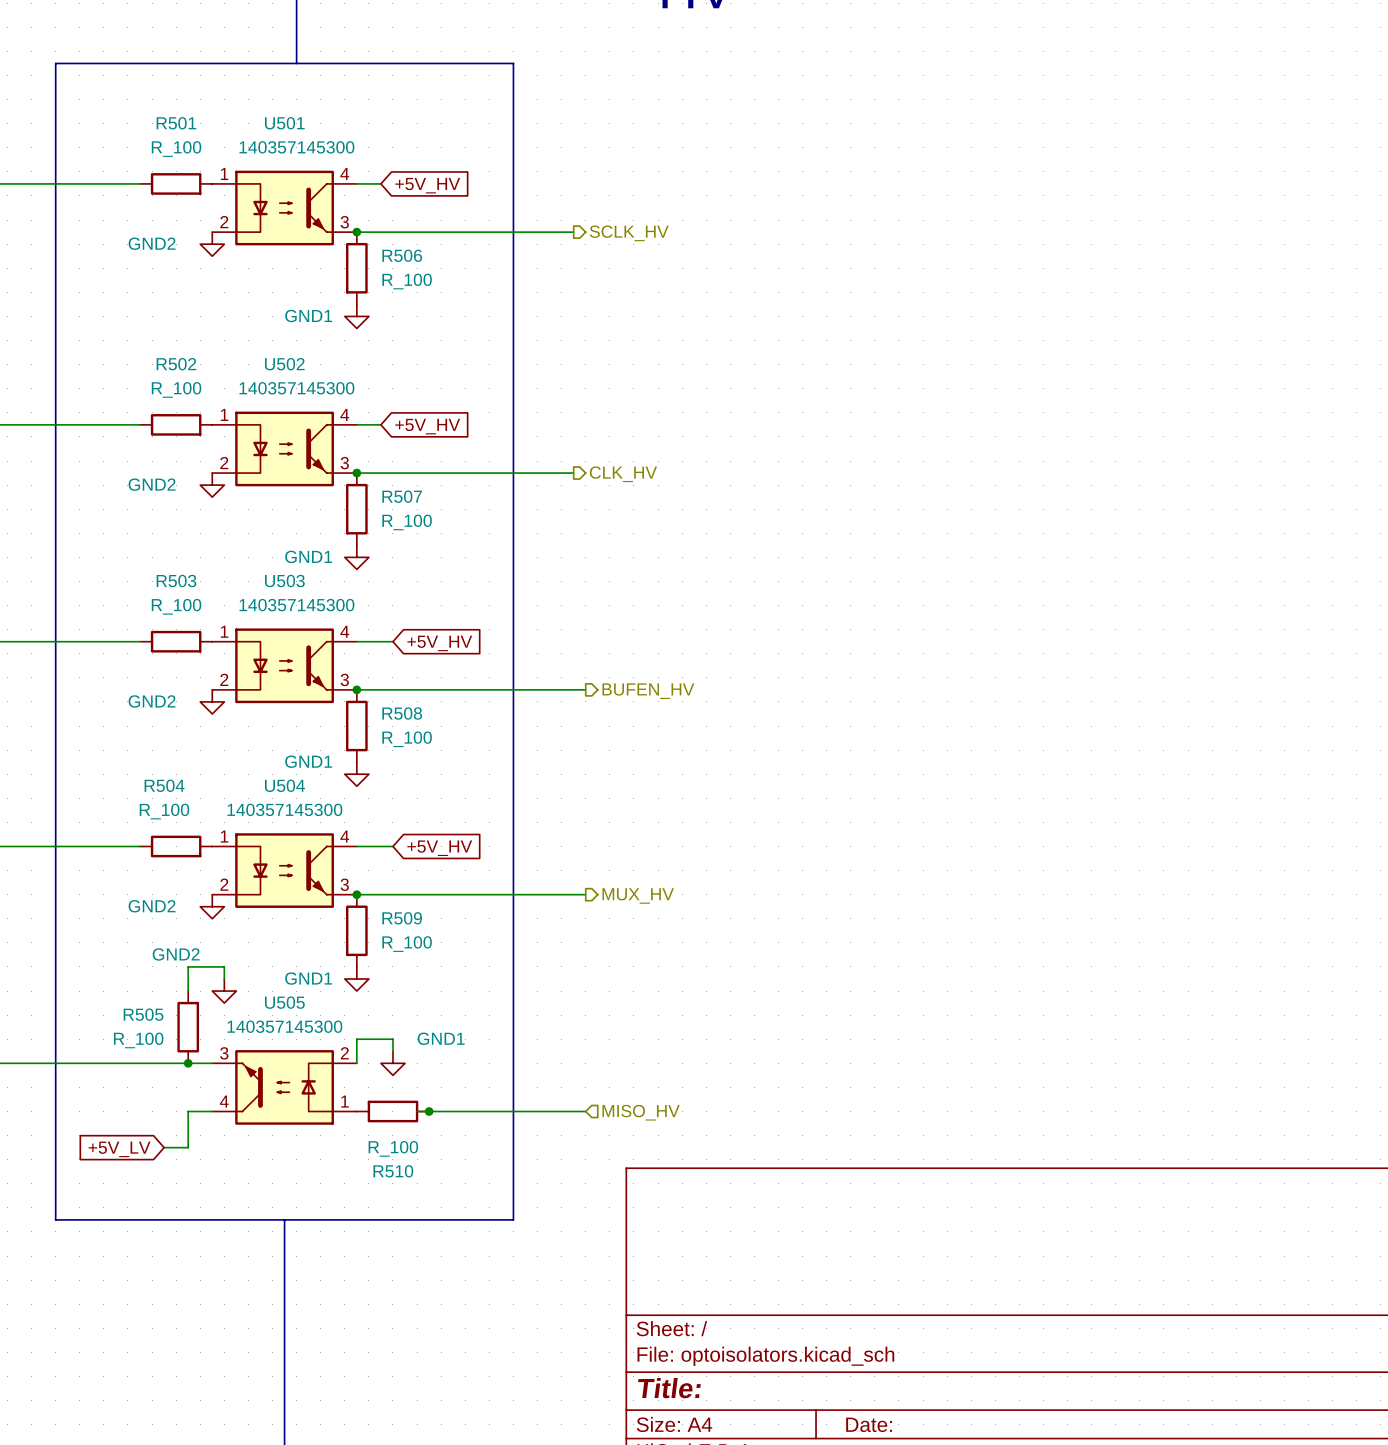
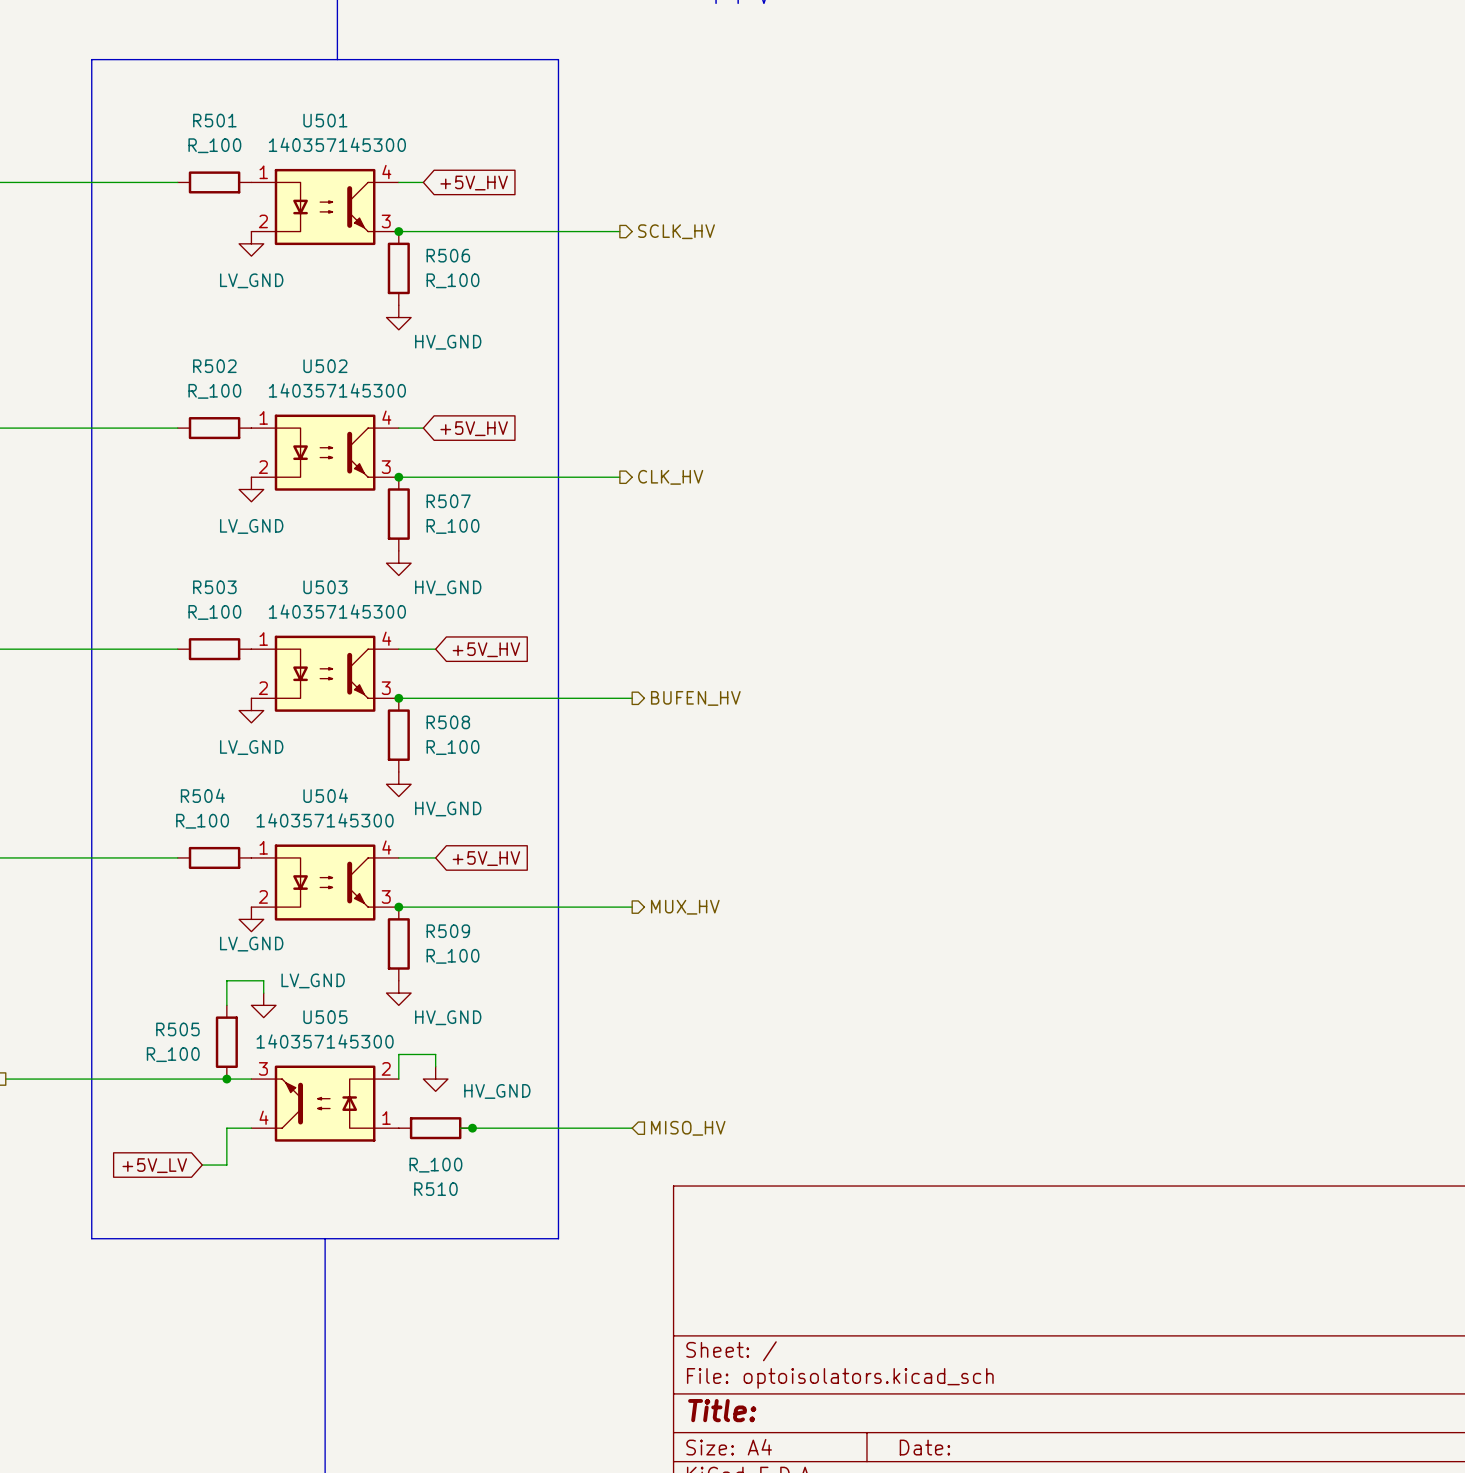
power symbol: GND2 (212, 244) -> LV_GND (251, 243)
power symbol: GND1 (356, 316) -> HV_GND (398, 317)
power symbol: GND2 (212, 485) -> LV_GND (251, 489)
power symbol: GND1 (356, 557) -> HV_GND (398, 563)
power symbol: GND2 (212, 701) -> LV_GND (251, 710)
power symbol: GND1 (356, 774) -> HV_GND (398, 784)
power symbol: GND2 (212, 906) -> LV_GND (251, 919)
power symbol: GND1 (356, 978) -> HV_GND (398, 993)
power symbol: GND2 (224, 991) -> LV_GND (263, 1005)
power symbol: GND1 (392, 1063) -> HV_GND (435, 1079)

